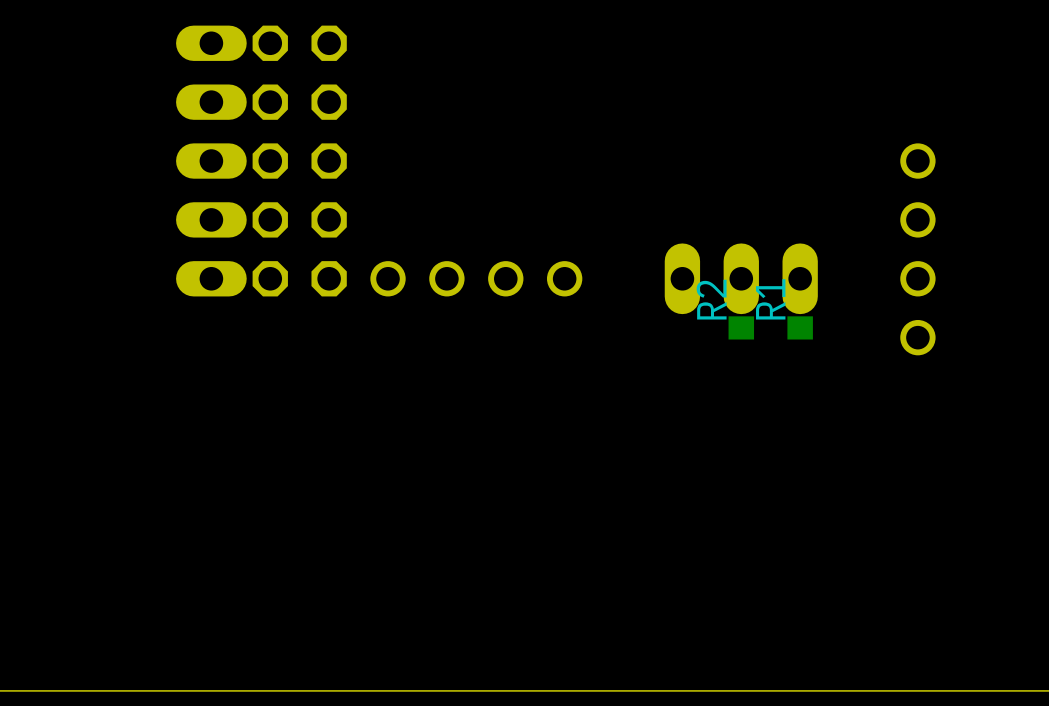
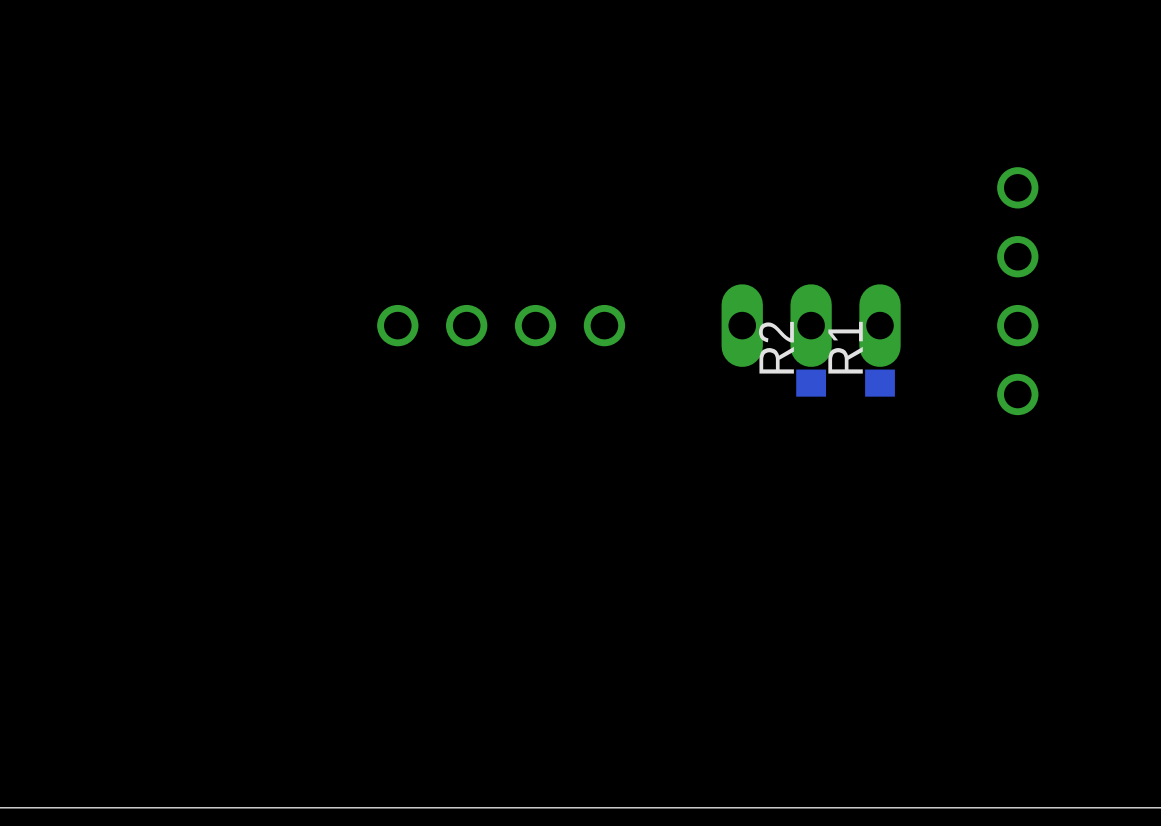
part: (211, 161) -> none
part: (299, 161) -> none

